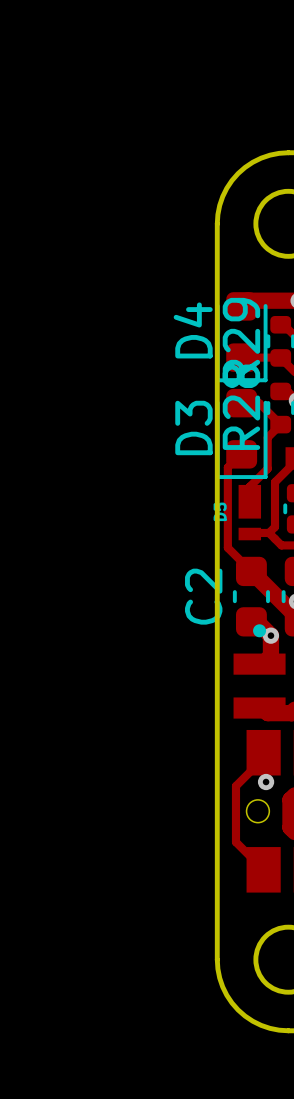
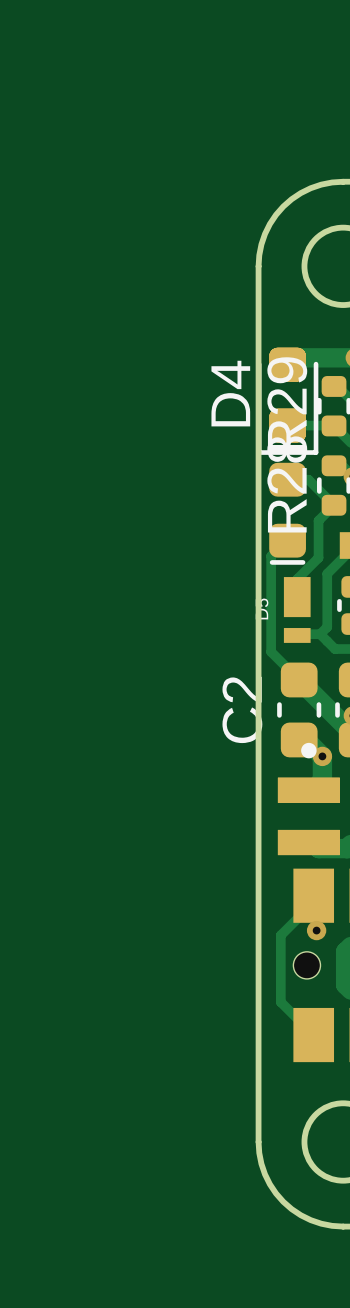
part: none -> (287, 398)
part: none -> (287, 513)
D3: (241, 433) -> none
part: none -> (308, 816)

